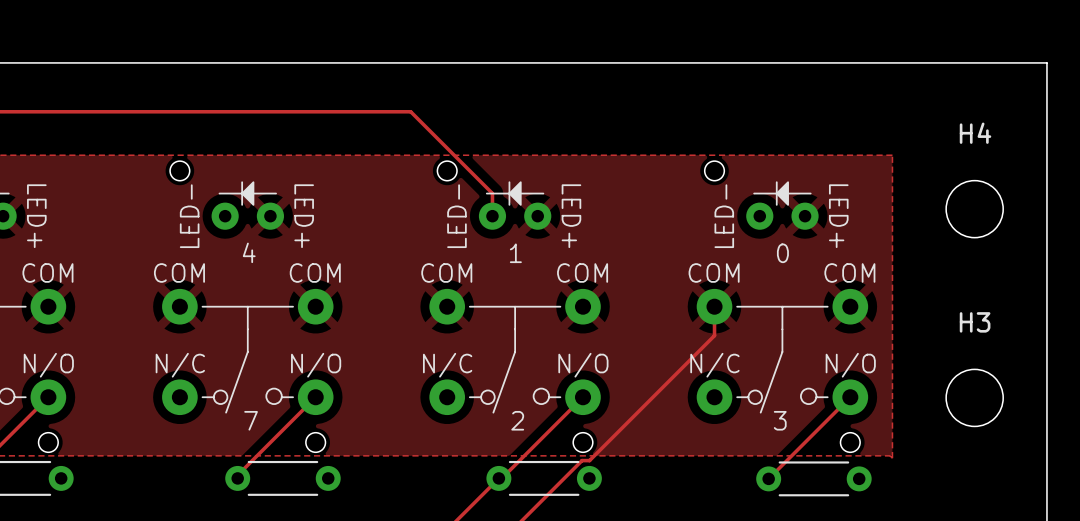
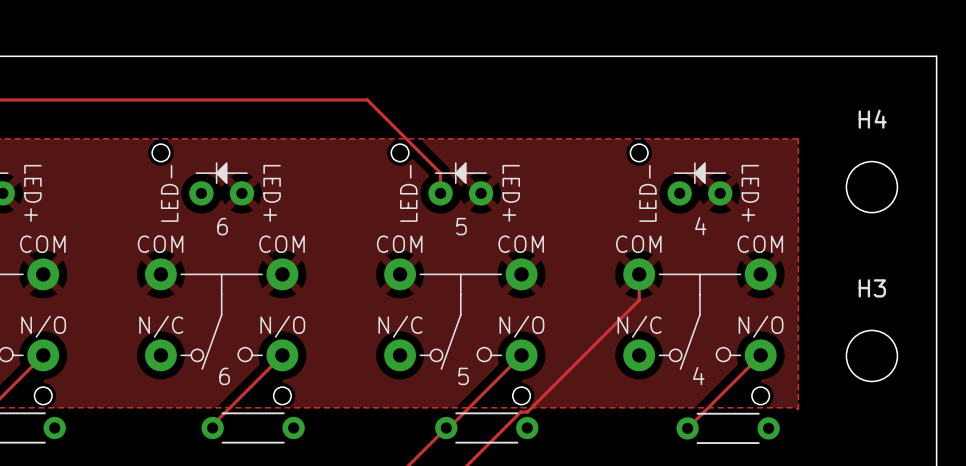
text: 4 (249, 252) -> 6 (222, 226)
text: 1 (515, 253) -> 5 (461, 226)
text: 0 (782, 253) -> 4 (700, 226)
text: 7 (251, 420) -> 6 (224, 376)
text: 2 (517, 420) -> 5 (463, 376)
text: 3 (780, 420) -> 4 (698, 376)

